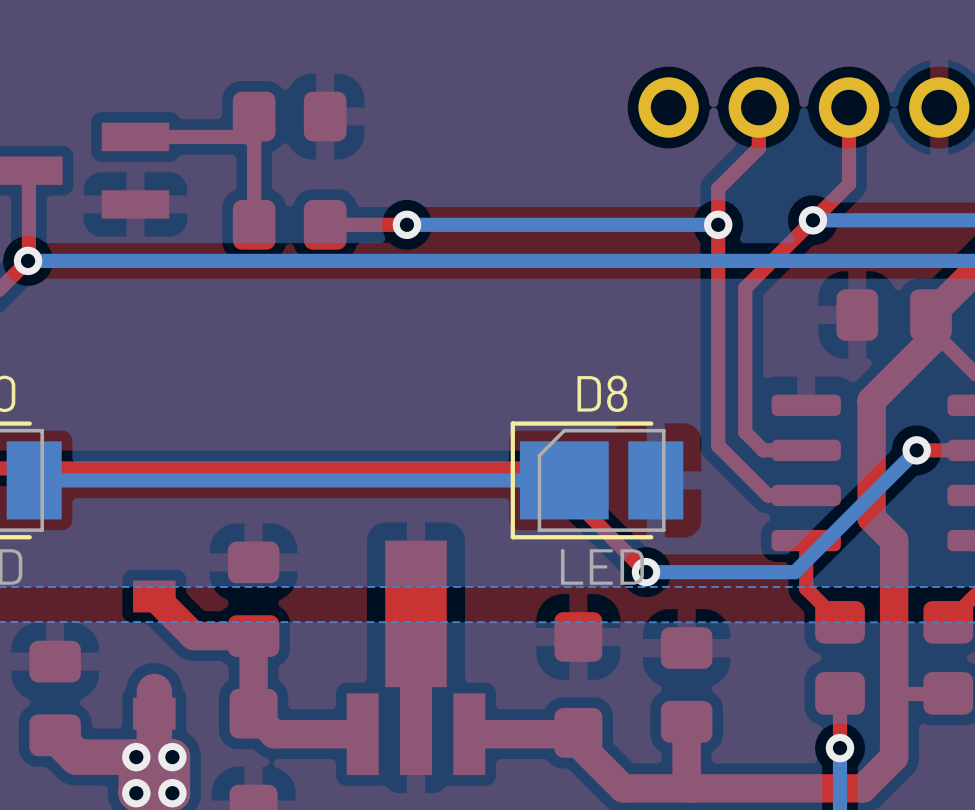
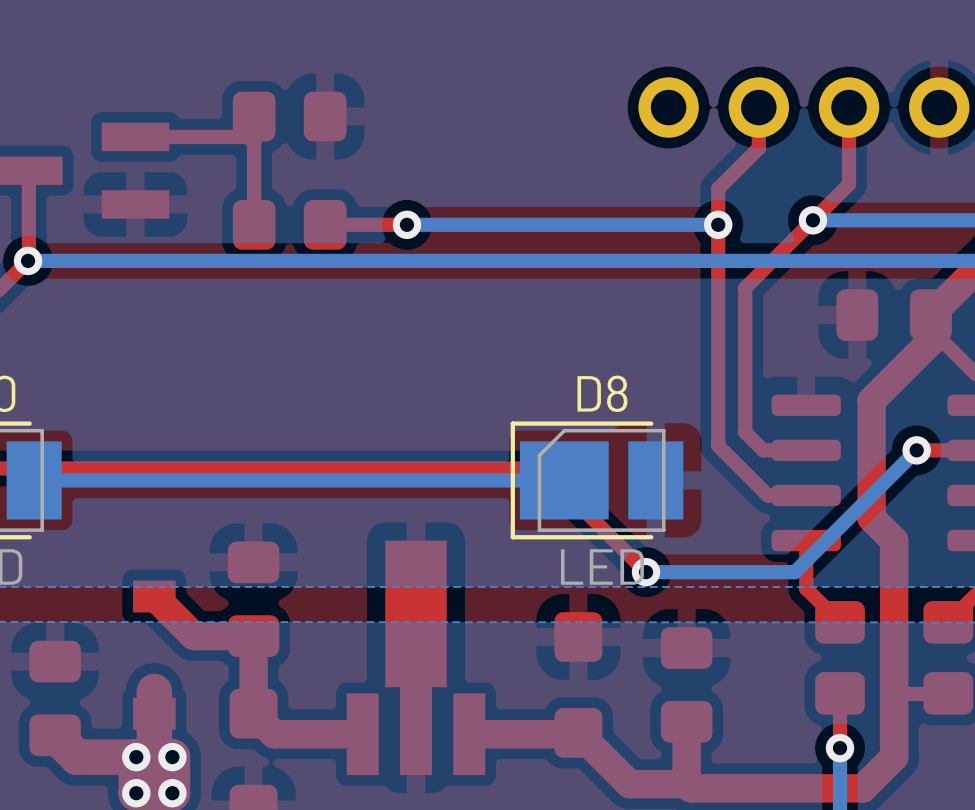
top track: none -> (578, 732) (629, 784) (686, 784)
top track: (578, 743) (623, 788) -> none
top track: (690, 788) (623, 788) -> none

